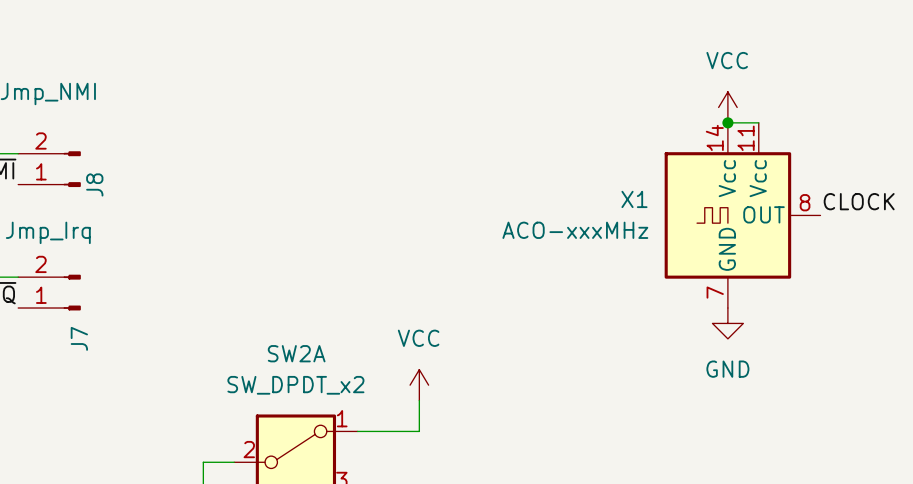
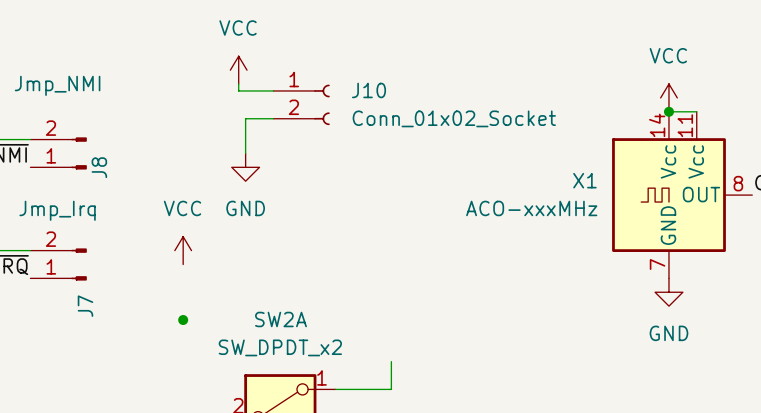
power symbol: none -> VCC (238, 70)
wire: none -> (238, 84) (238, 90) (273, 90)
J10: none -> Conn_01x02_Socket (301, 104)
wire: none -> (273, 118) (245, 118) (245, 153)
power symbol: none -> GND (245, 167)
power symbol: none -> VCC (183, 250)
junction: none -> (183, 320)
power symbol: VCC (419, 385) -> none

